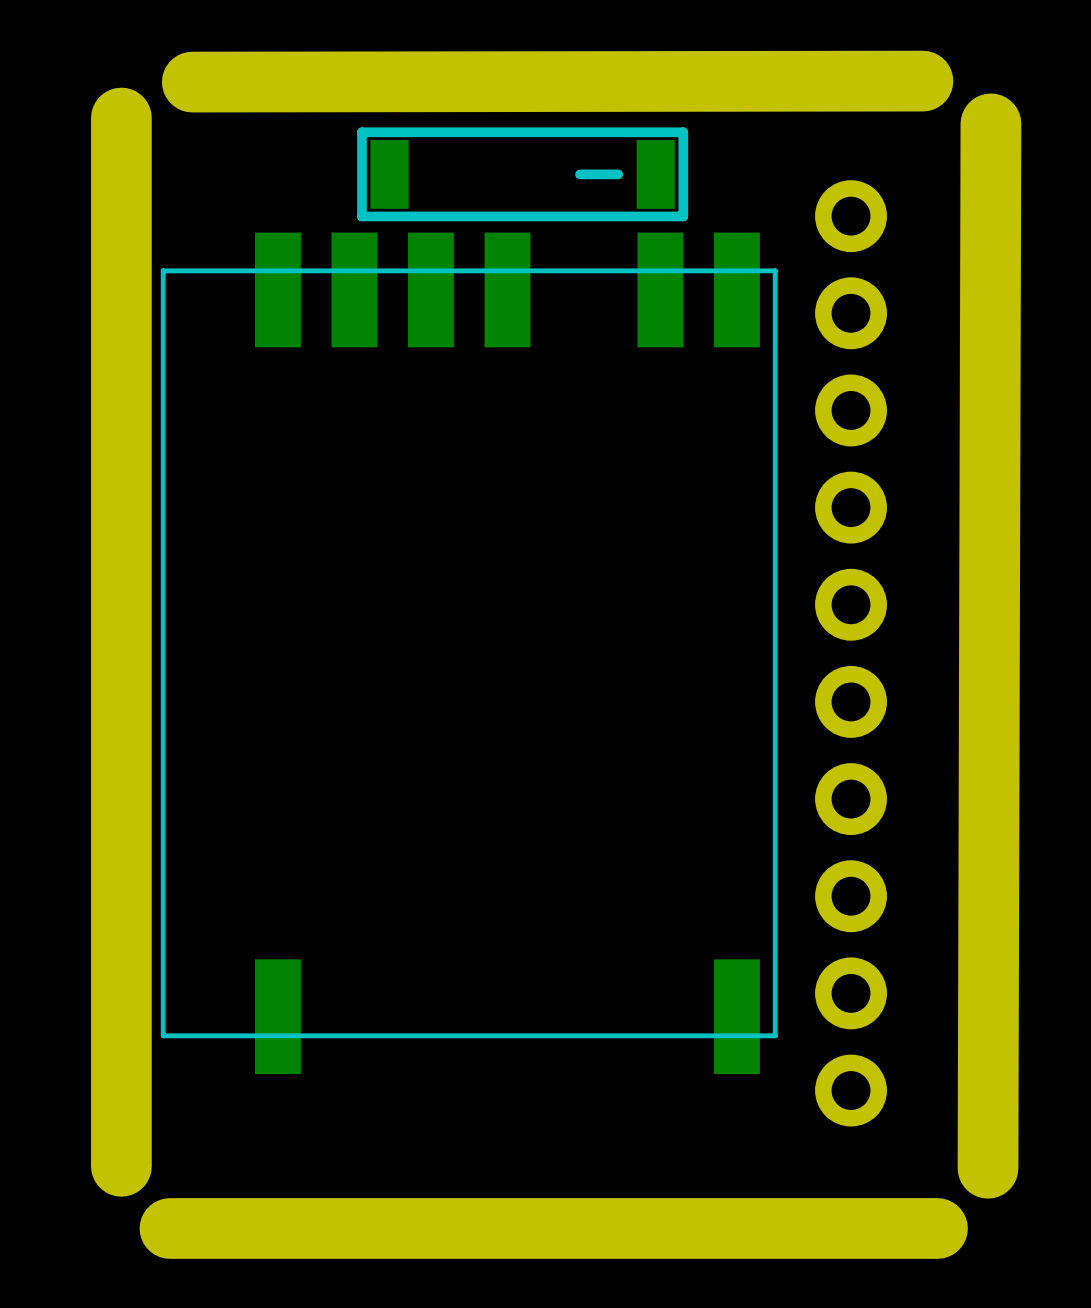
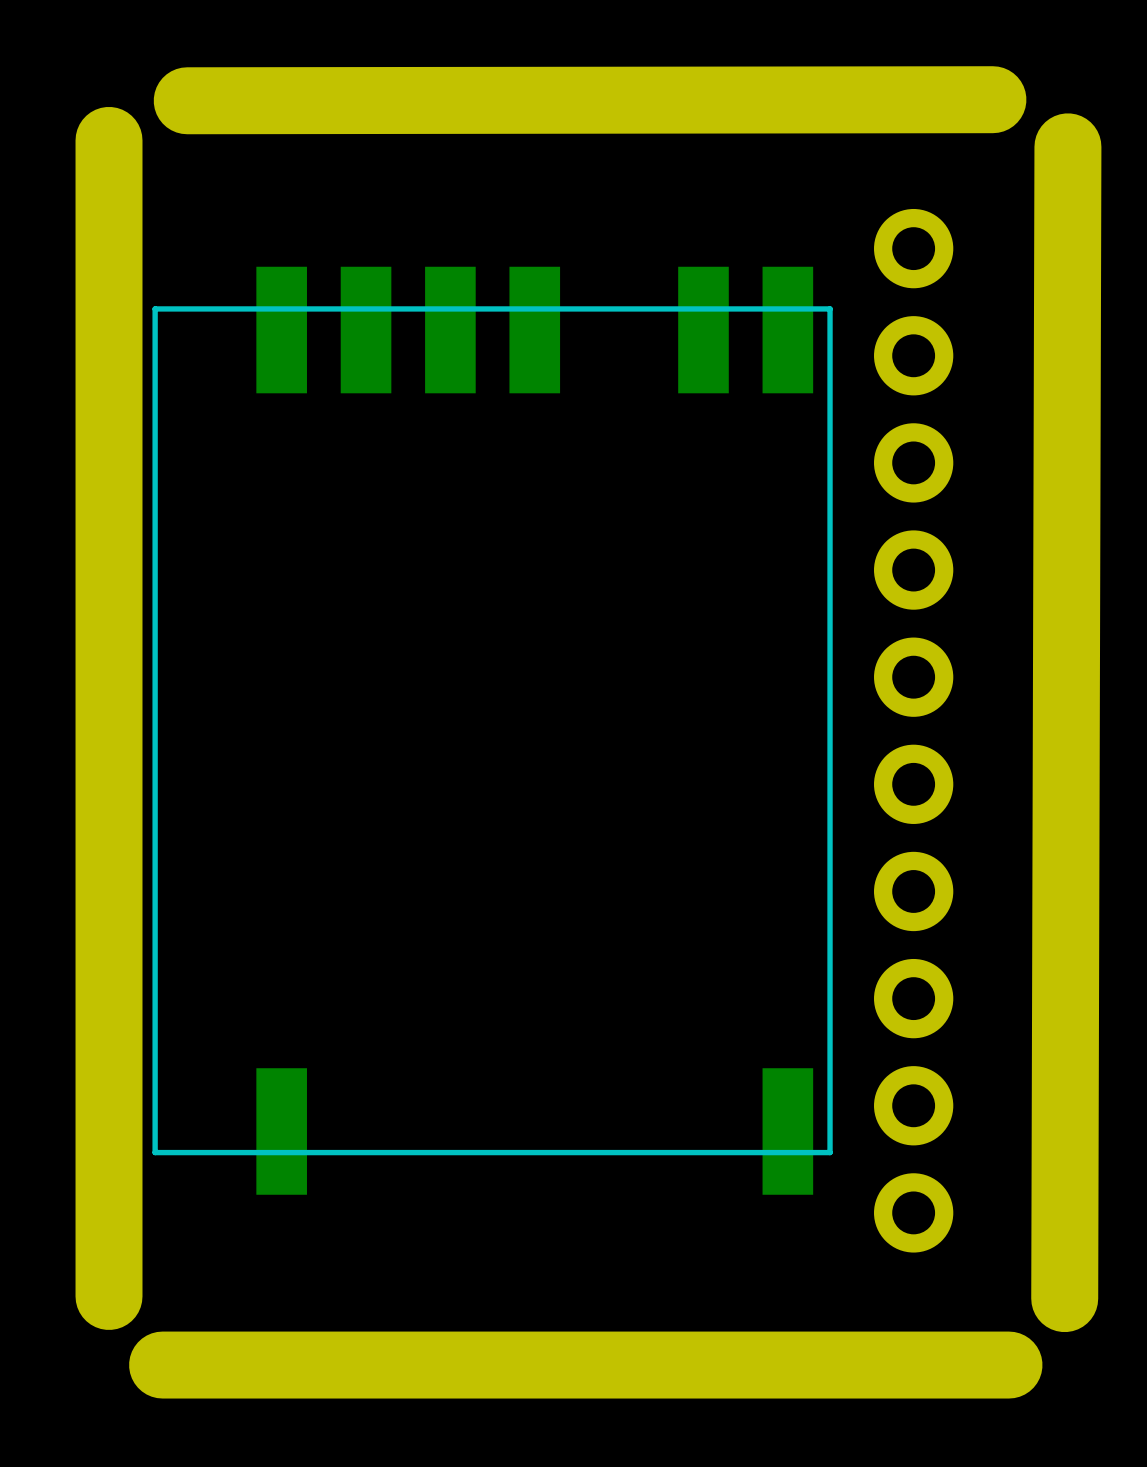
part: (522, 174) -> none

